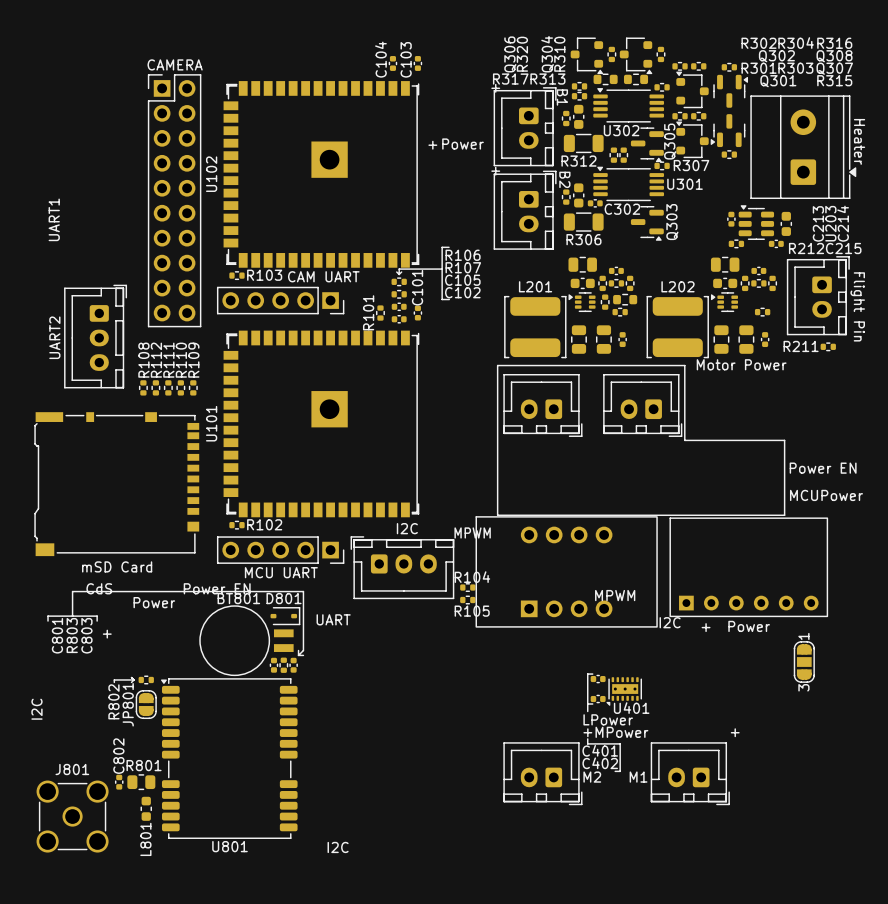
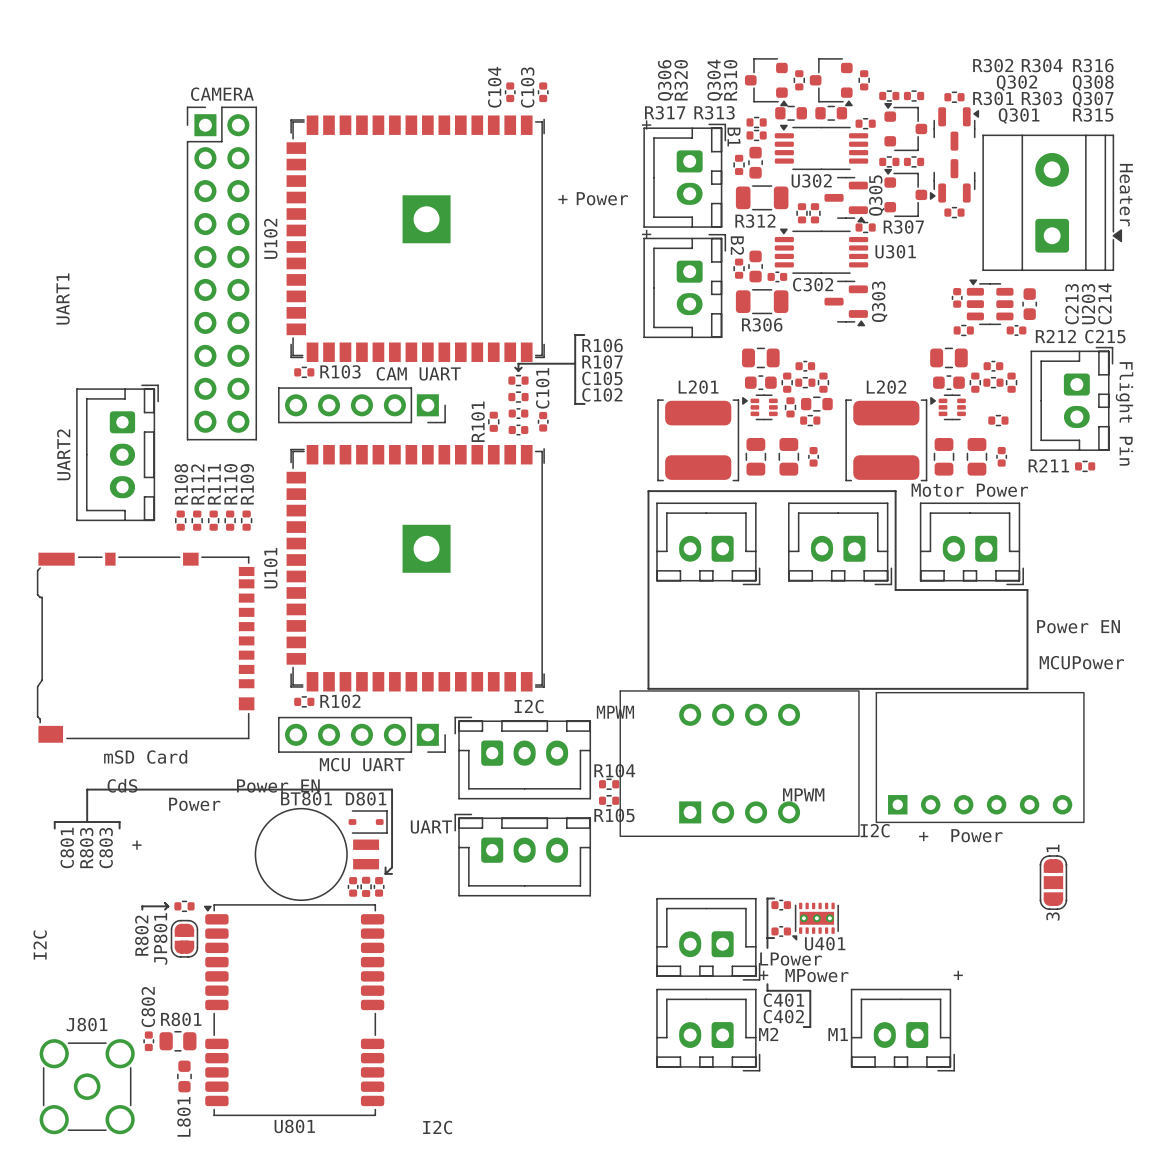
part: none -> (971, 543)
part: none -> (522, 855)
part: none -> (708, 939)

